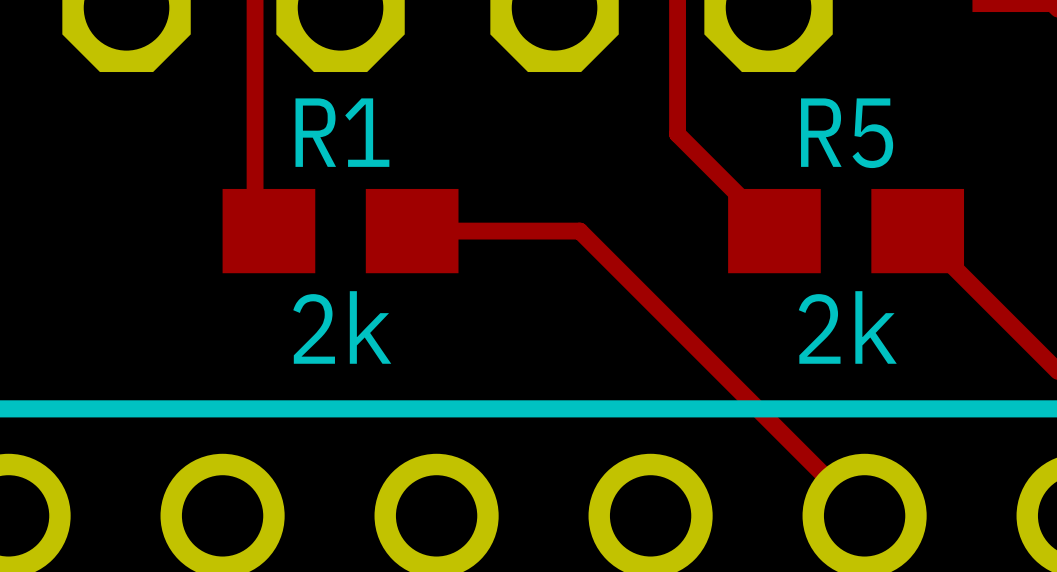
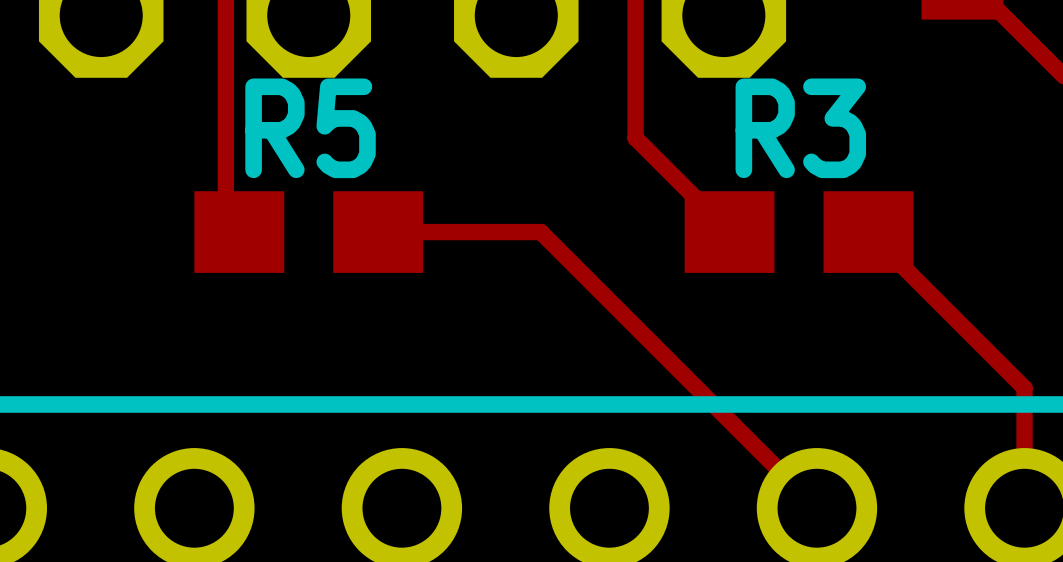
R1 name: R1 (342, 132) -> R5 (310, 128)
R5 name: R5 (847, 133) -> R3 (800, 128)
R1 value: 2k (342, 327) -> none
R5 value: 2k (847, 327) -> none

